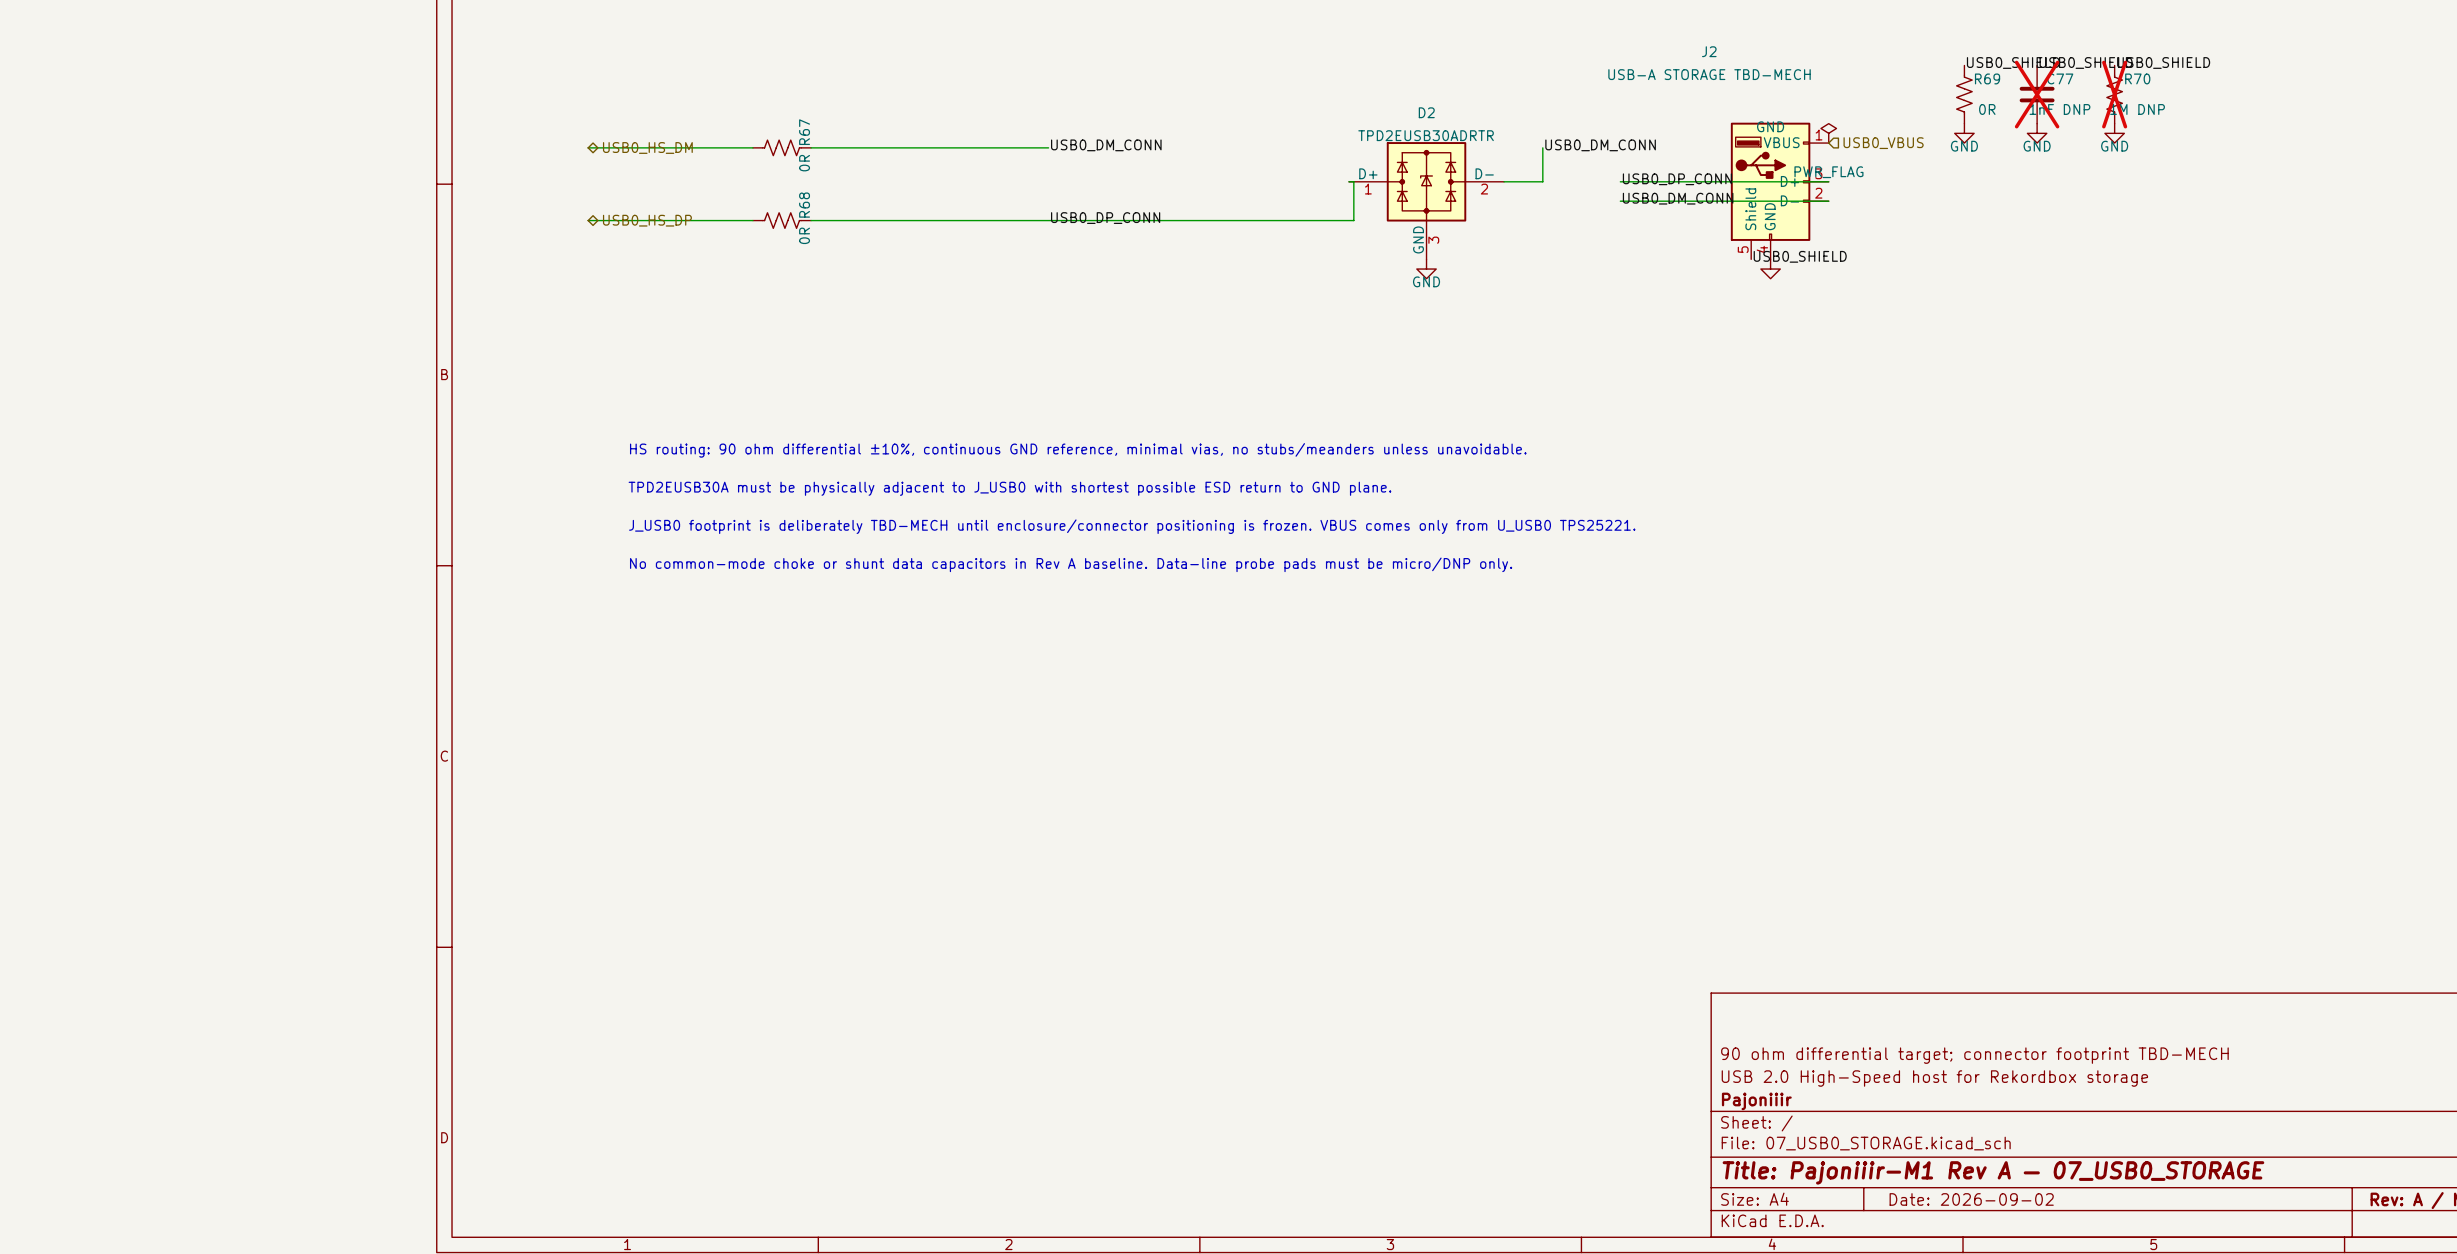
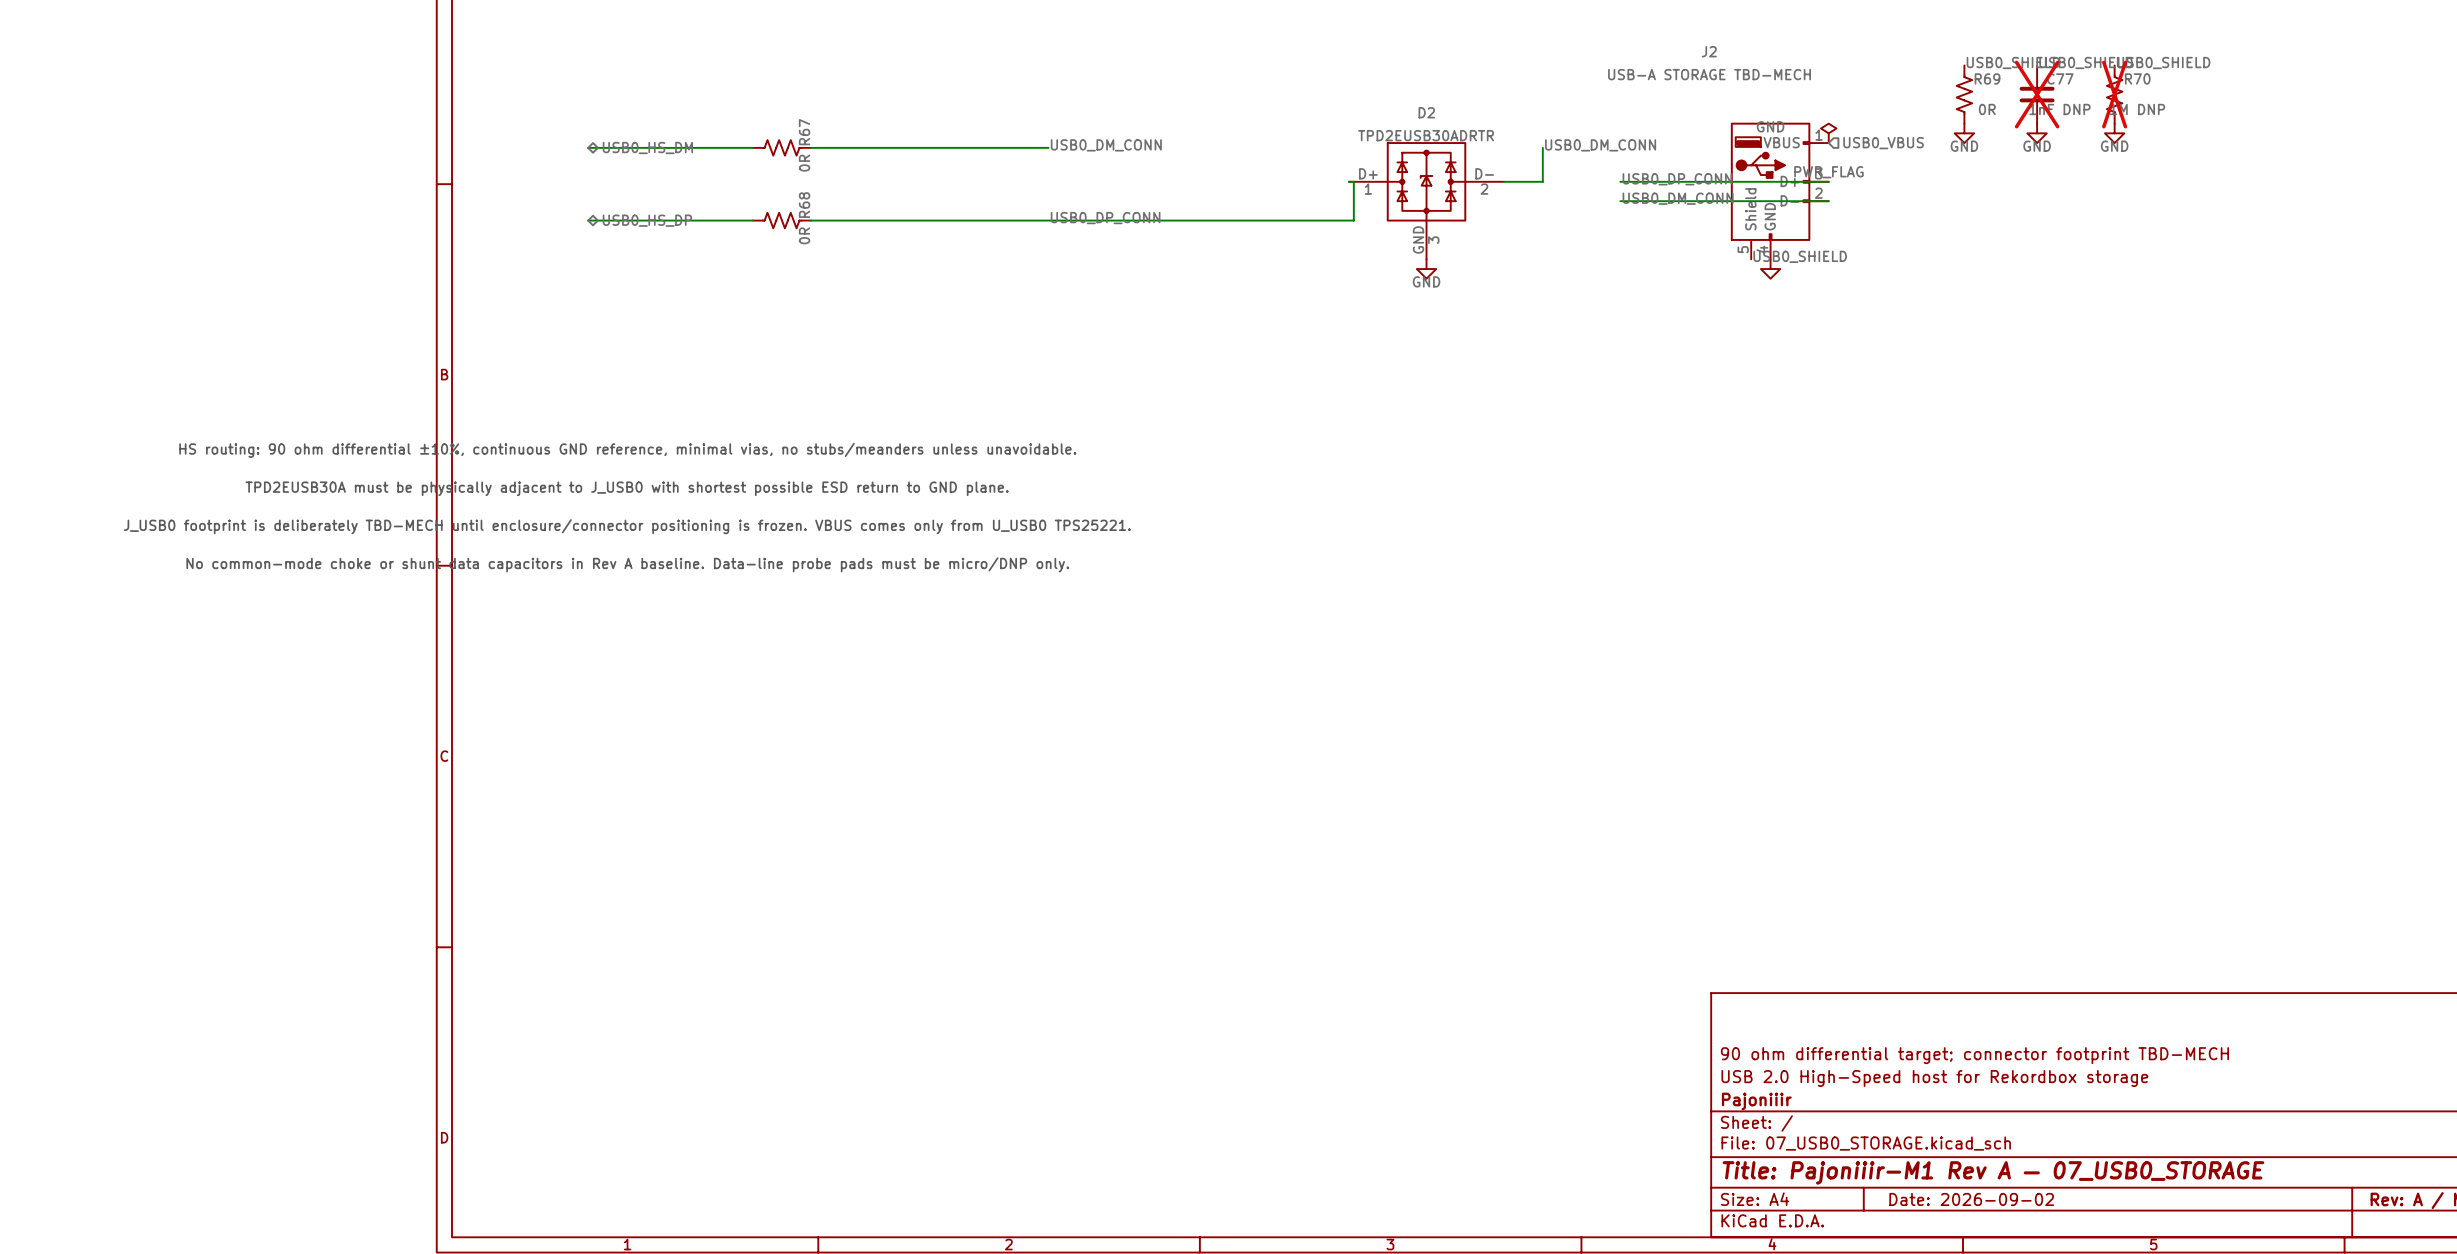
text position: HS routing: 90 ohm differential ±10%, continuous GND reference, minimal vias, no stubs/meanders unless unavoidable. (1078, 450) -> HS routing: 90 ohm differential ±10%, continuous GND reference, minimal vias, no stubs/meanders unless unavoidable. (627, 450)
text position: TPD2EUSB30A must be physically adjacent to J_USB0 with shortest possible ESD return to GND plane. (1009, 488) -> TPD2EUSB30A must be physically adjacent to J_USB0 with shortest possible ESD return to GND plane. (627, 488)
text position: J_USB0 footprint is deliberately TBD-MECH until enclosure/connector positioning is frozen. VBUS comes only from U_USB0 TPS25221. (1132, 526) -> J_USB0 footprint is deliberately TBD-MECH until enclosure/connector positioning is frozen. VBUS comes only from U_USB0 TPS25221. (627, 526)
text position: No common-mode choke or shunt data capacitors in Rev A baseline. Data-line probe pads must be micro/DNP only. (1071, 564) -> No common-mode choke or shunt data capacitors in Rev A baseline. Data-line probe pads must be micro/DNP only. (627, 564)

